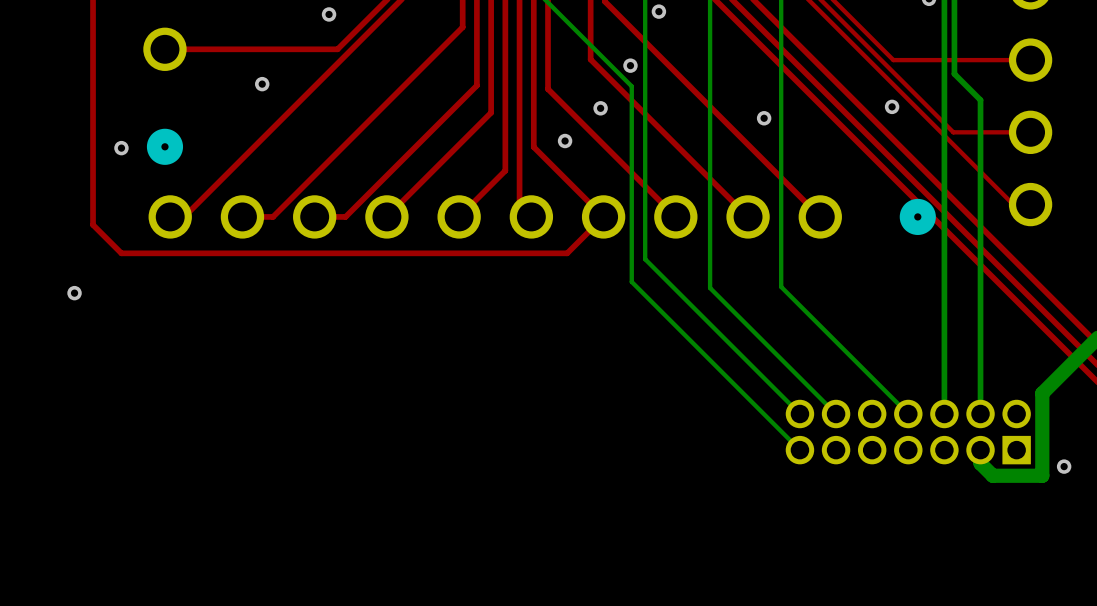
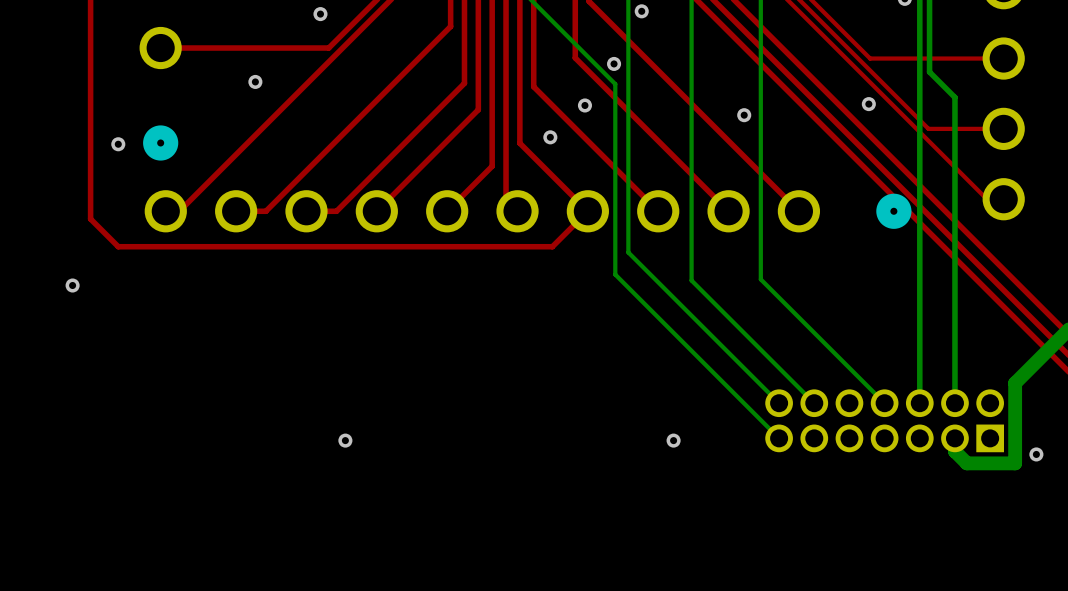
via: none -> (345, 440)
via: none -> (673, 440)

